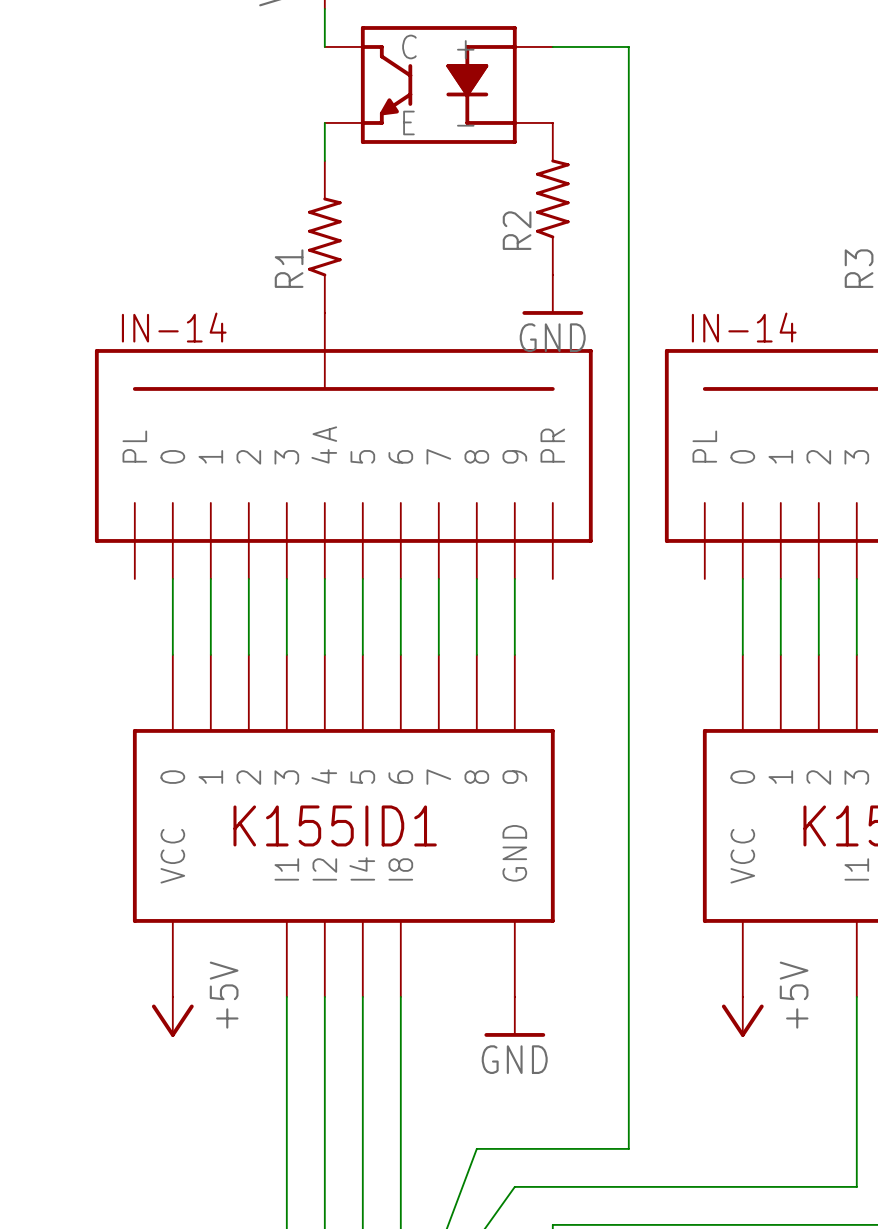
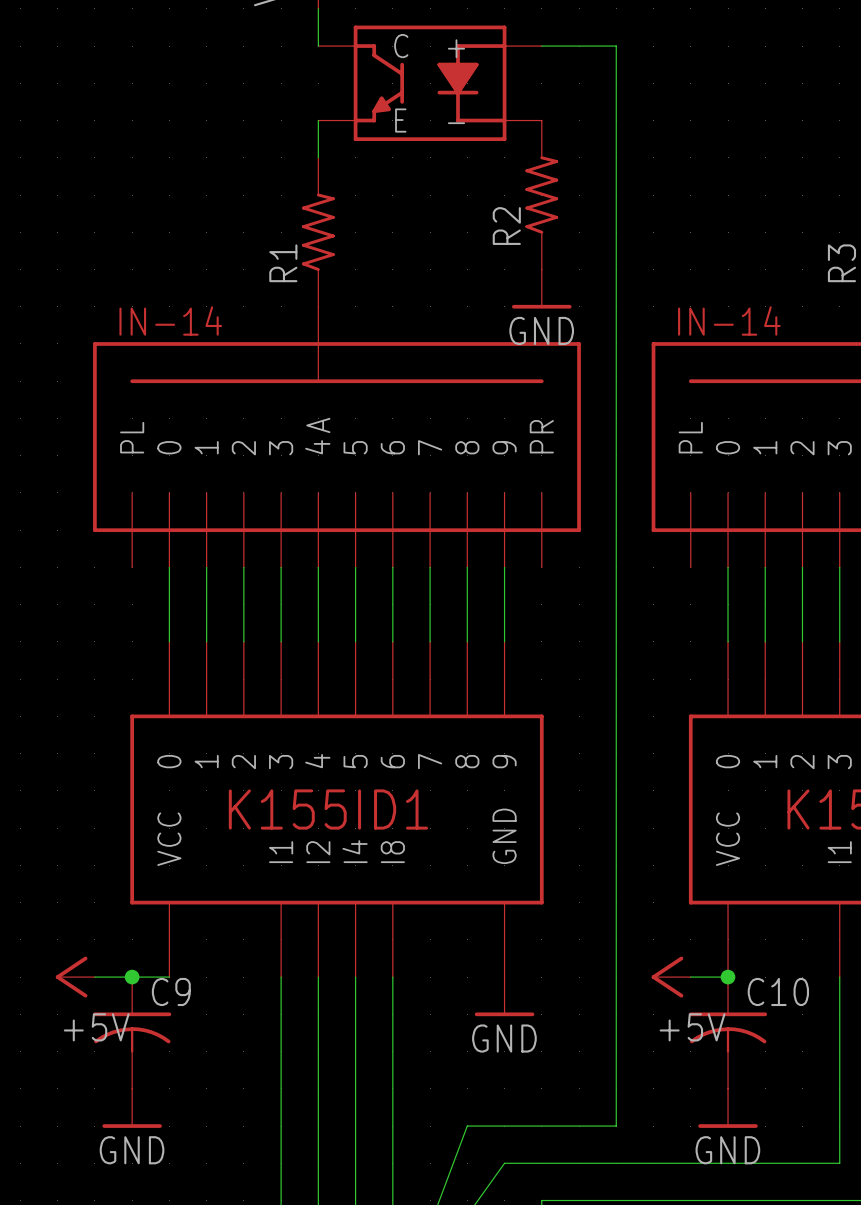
wire: none -> (94, 977) (169, 977)
junction: none -> (132, 977)
wire: none -> (690, 977) (728, 977)
junction: none -> (728, 977)
power symbol position: +5V (172, 1016) -> +5V (75, 977)
power symbol position: +5V (742, 1016) -> +5V (671, 977)
power symbol rotation: 0° (172, 1020) -> 90° clockwise (71, 977)
power symbol rotation: 0° (742, 1020) -> 90° clockwise (667, 977)
C9: none -> (132, 1032)
C10: none -> (728, 1032)
power symbol: none -> GND (132, 1108)
power symbol: none -> GND (728, 1108)

